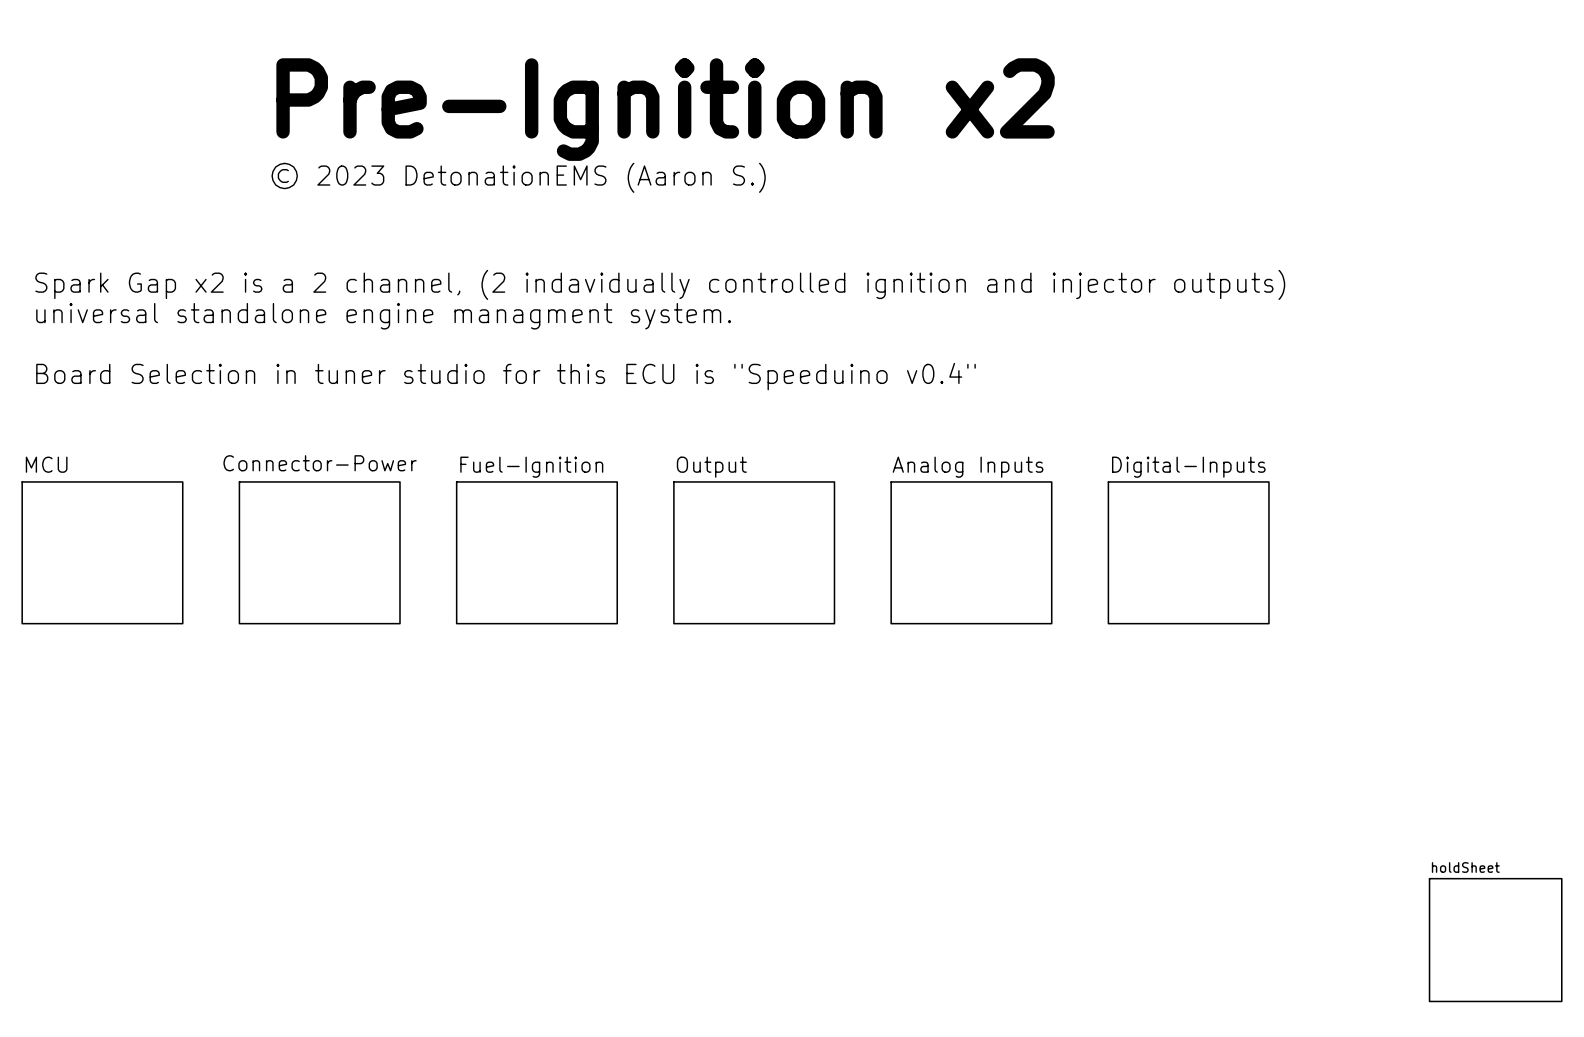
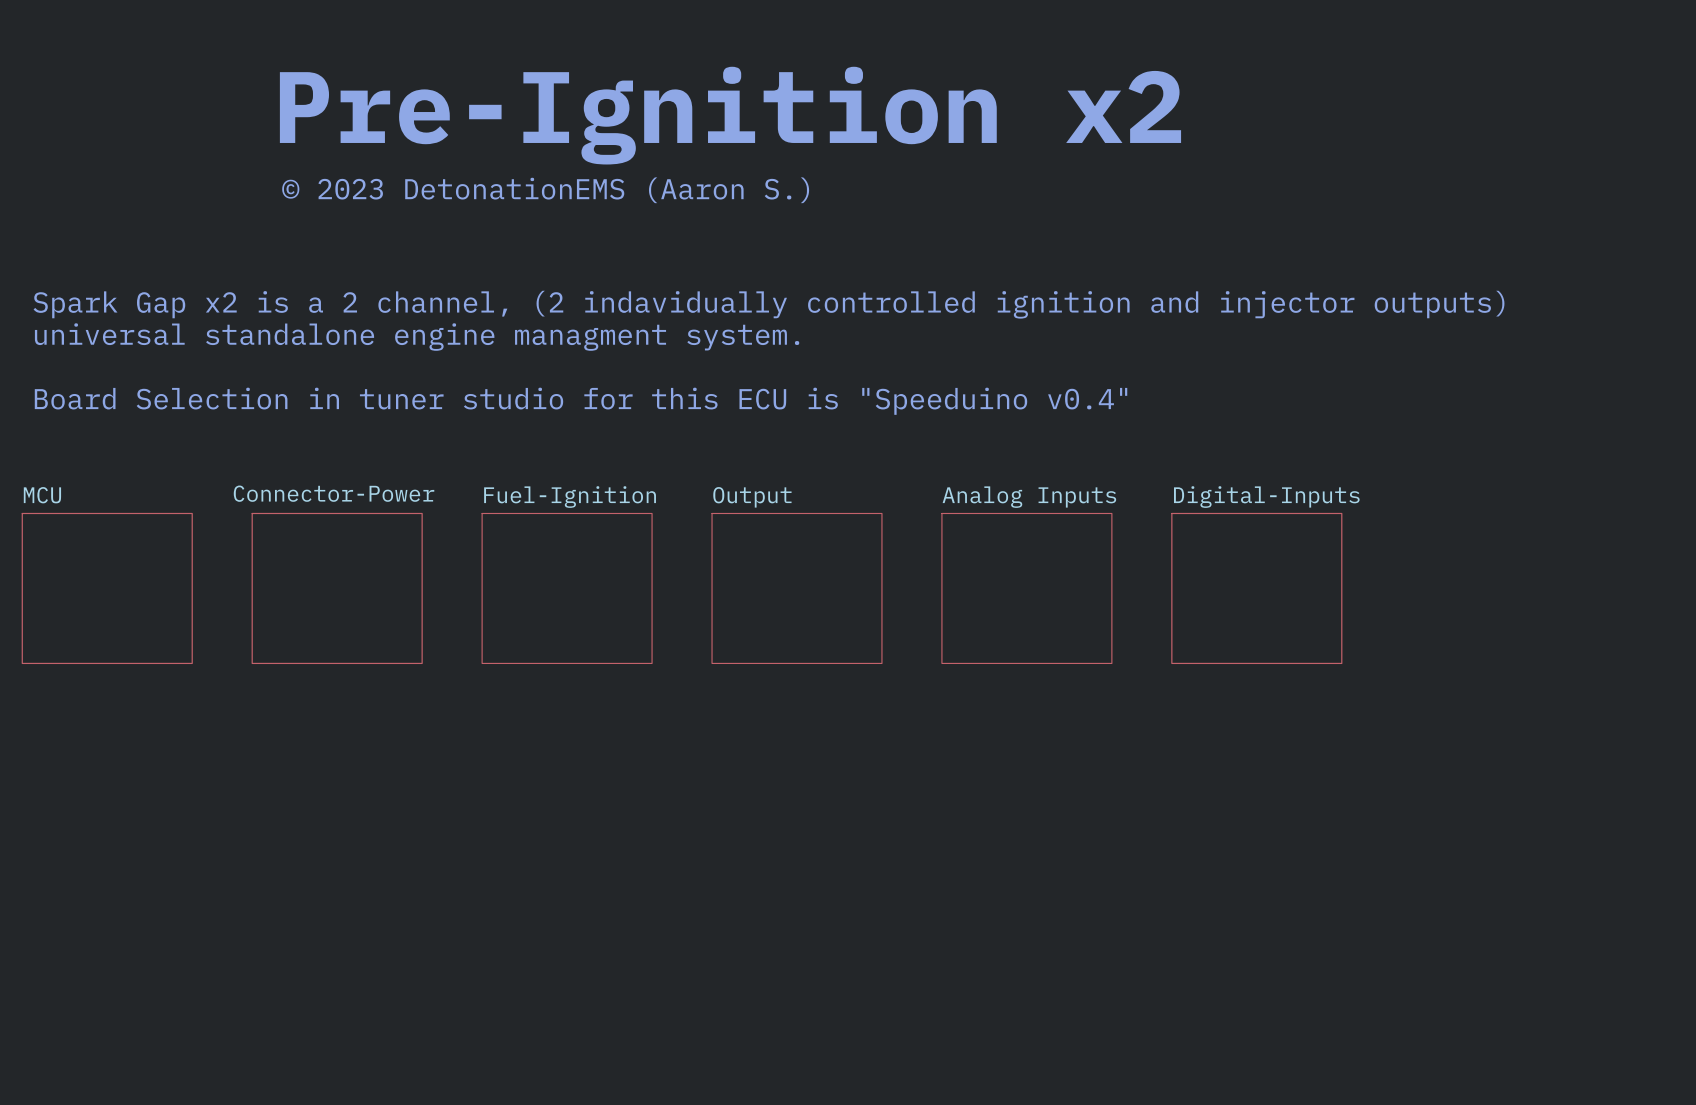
sheet holdSheet: (1495, 940) -> none

